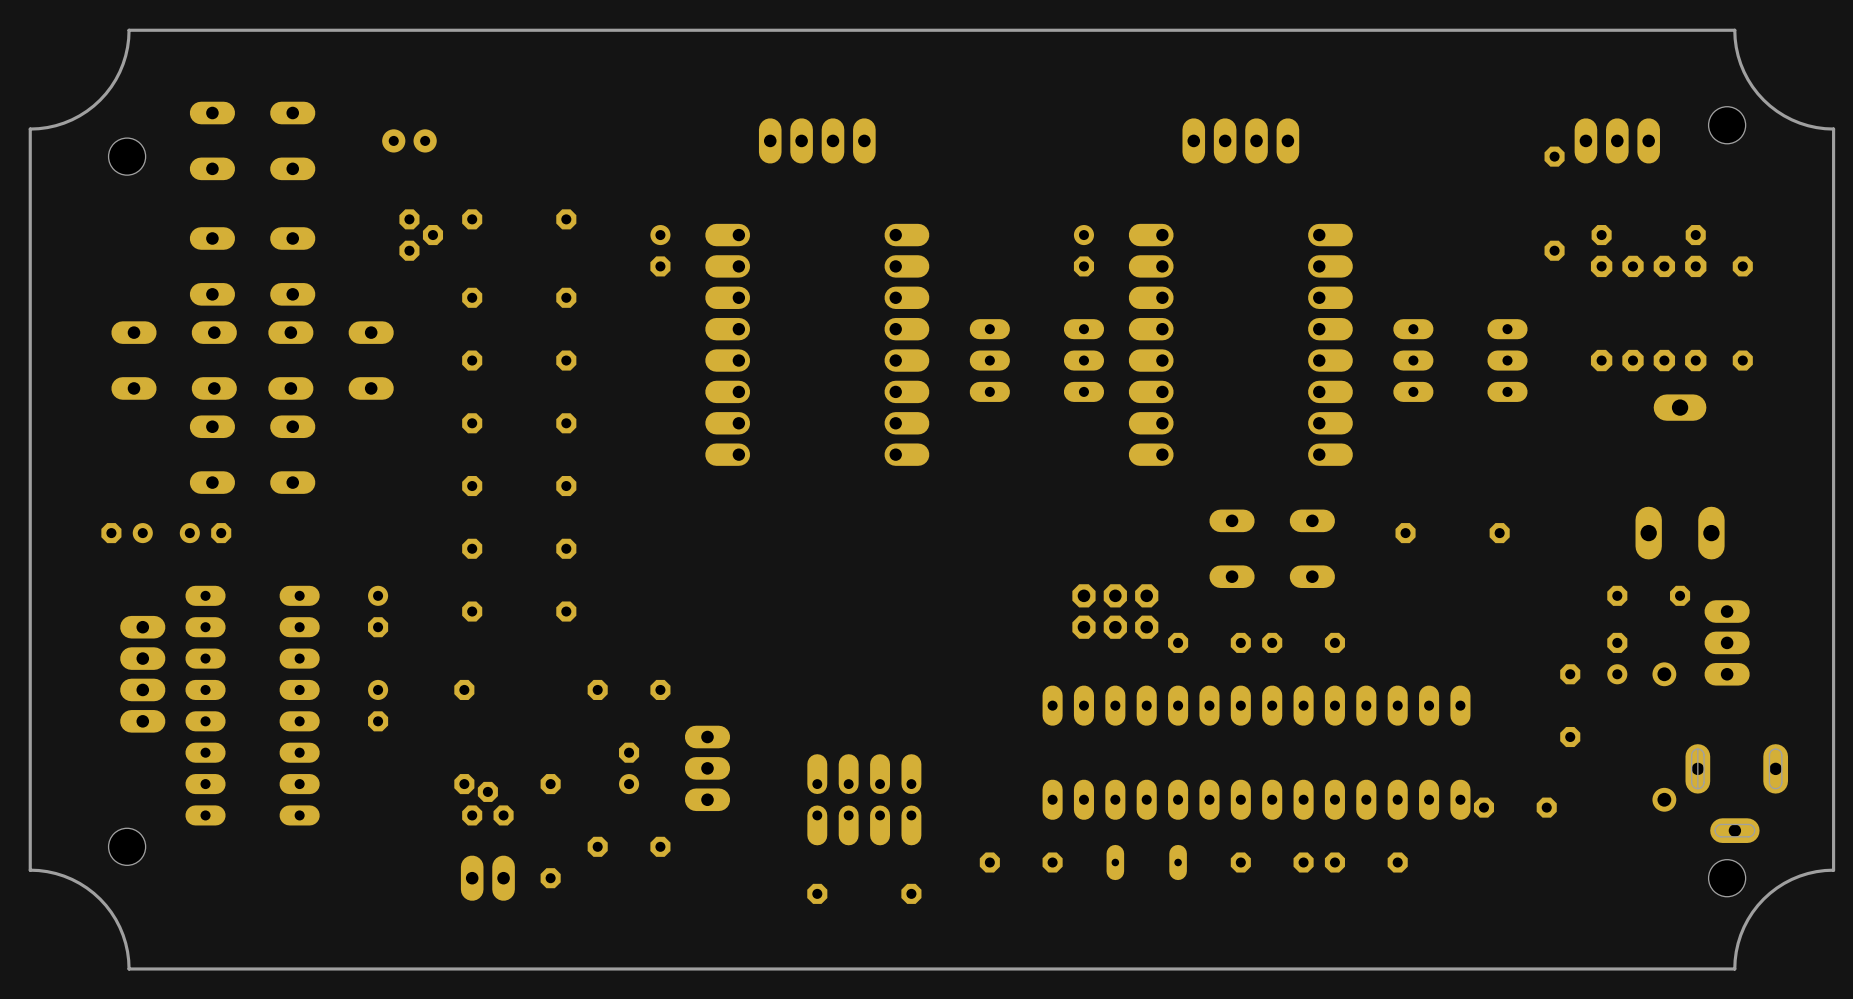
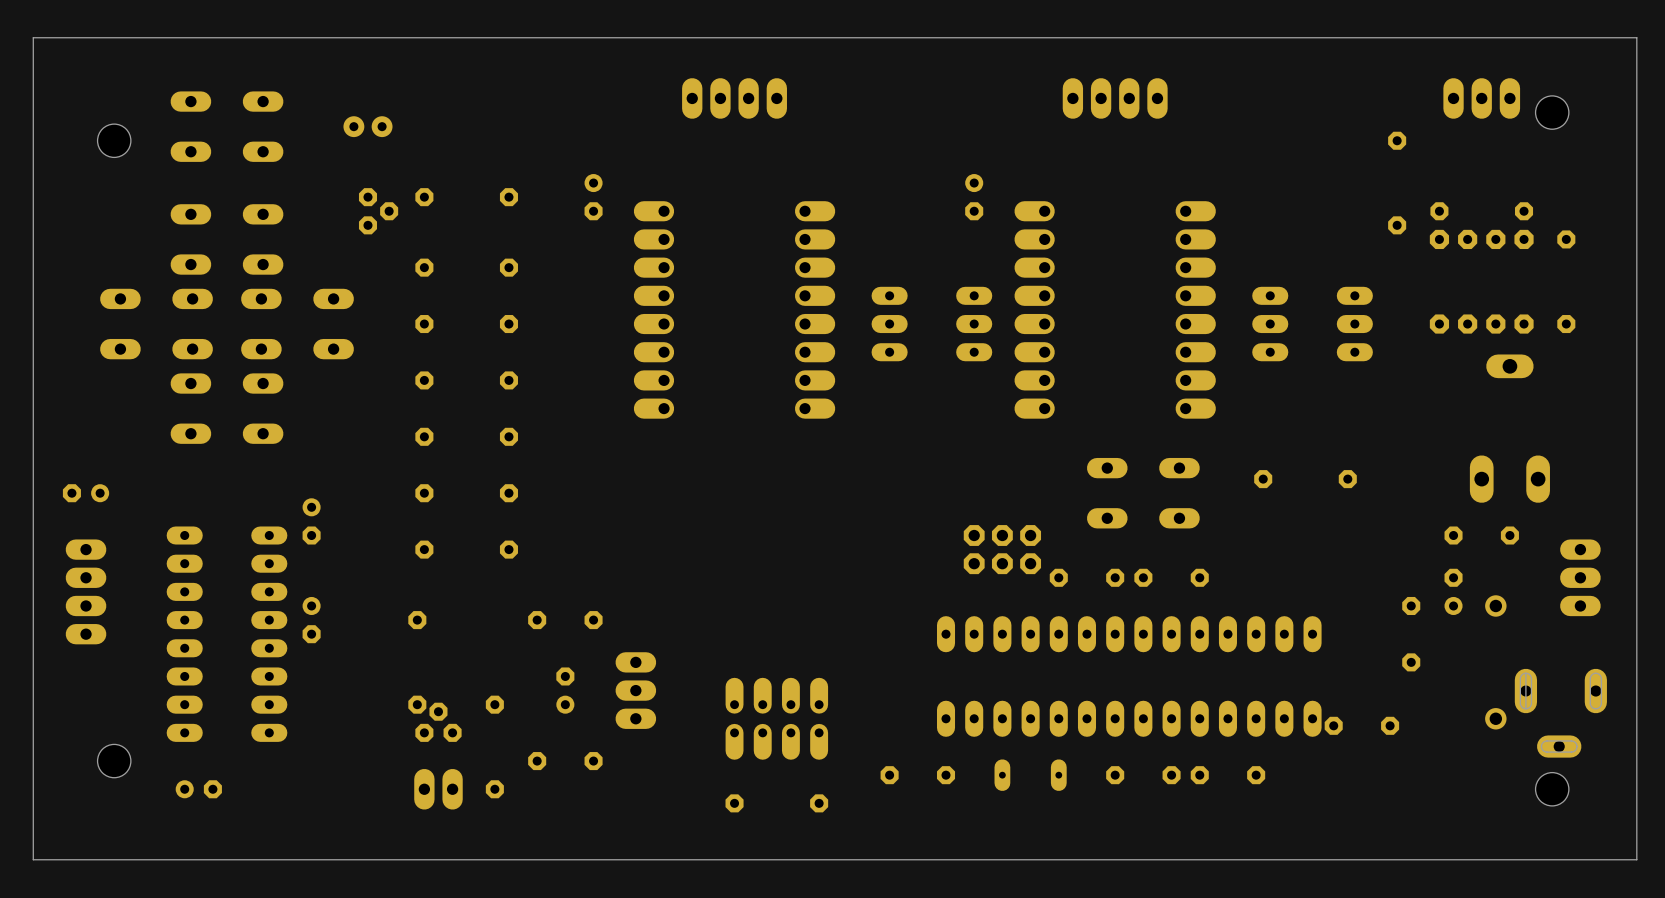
board edge: (1734, 30) (129, 30) (127, 47) (119, 72) (111, 86) (100, 100) (86, 111) (72, 119) (47, 127) (30, 129) (30, 870) (47, 871) (72, 879) (86, 888) (100, 899) (111, 912) (119, 927) (127, 951) (129, 968) (1734, 968) (1736, 951) (1744, 927) (1752, 912) (1763, 899) (1776, 888) (1791, 879) (1816, 871) (1833, 870) (1833, 129) (1816, 127) (1791, 119) (1776, 111) (1763, 100) (1752, 86) (1744, 72) (1736, 47) (1734, 30) -> (1636, 37) (1636, 859) (33, 859) (33, 37) (1636, 37)
part position: (817, 140) -> (734, 98)
part position: (1240, 140) -> (1115, 98)
part position: (1617, 140) -> (1481, 98)
part position: (660, 250) -> (593, 197)
part position: (1083, 250) -> (974, 197)
part position: (127, 533) -> (86, 493)
part: (205, 533) -> none
part: none -> (311, 521)
part: (378, 611) -> none
part position: (1727, 642) -> (1580, 577)
part position: (142, 674) -> (86, 591)
part position: (378, 705) -> (311, 620)
part: none -> (198, 789)

